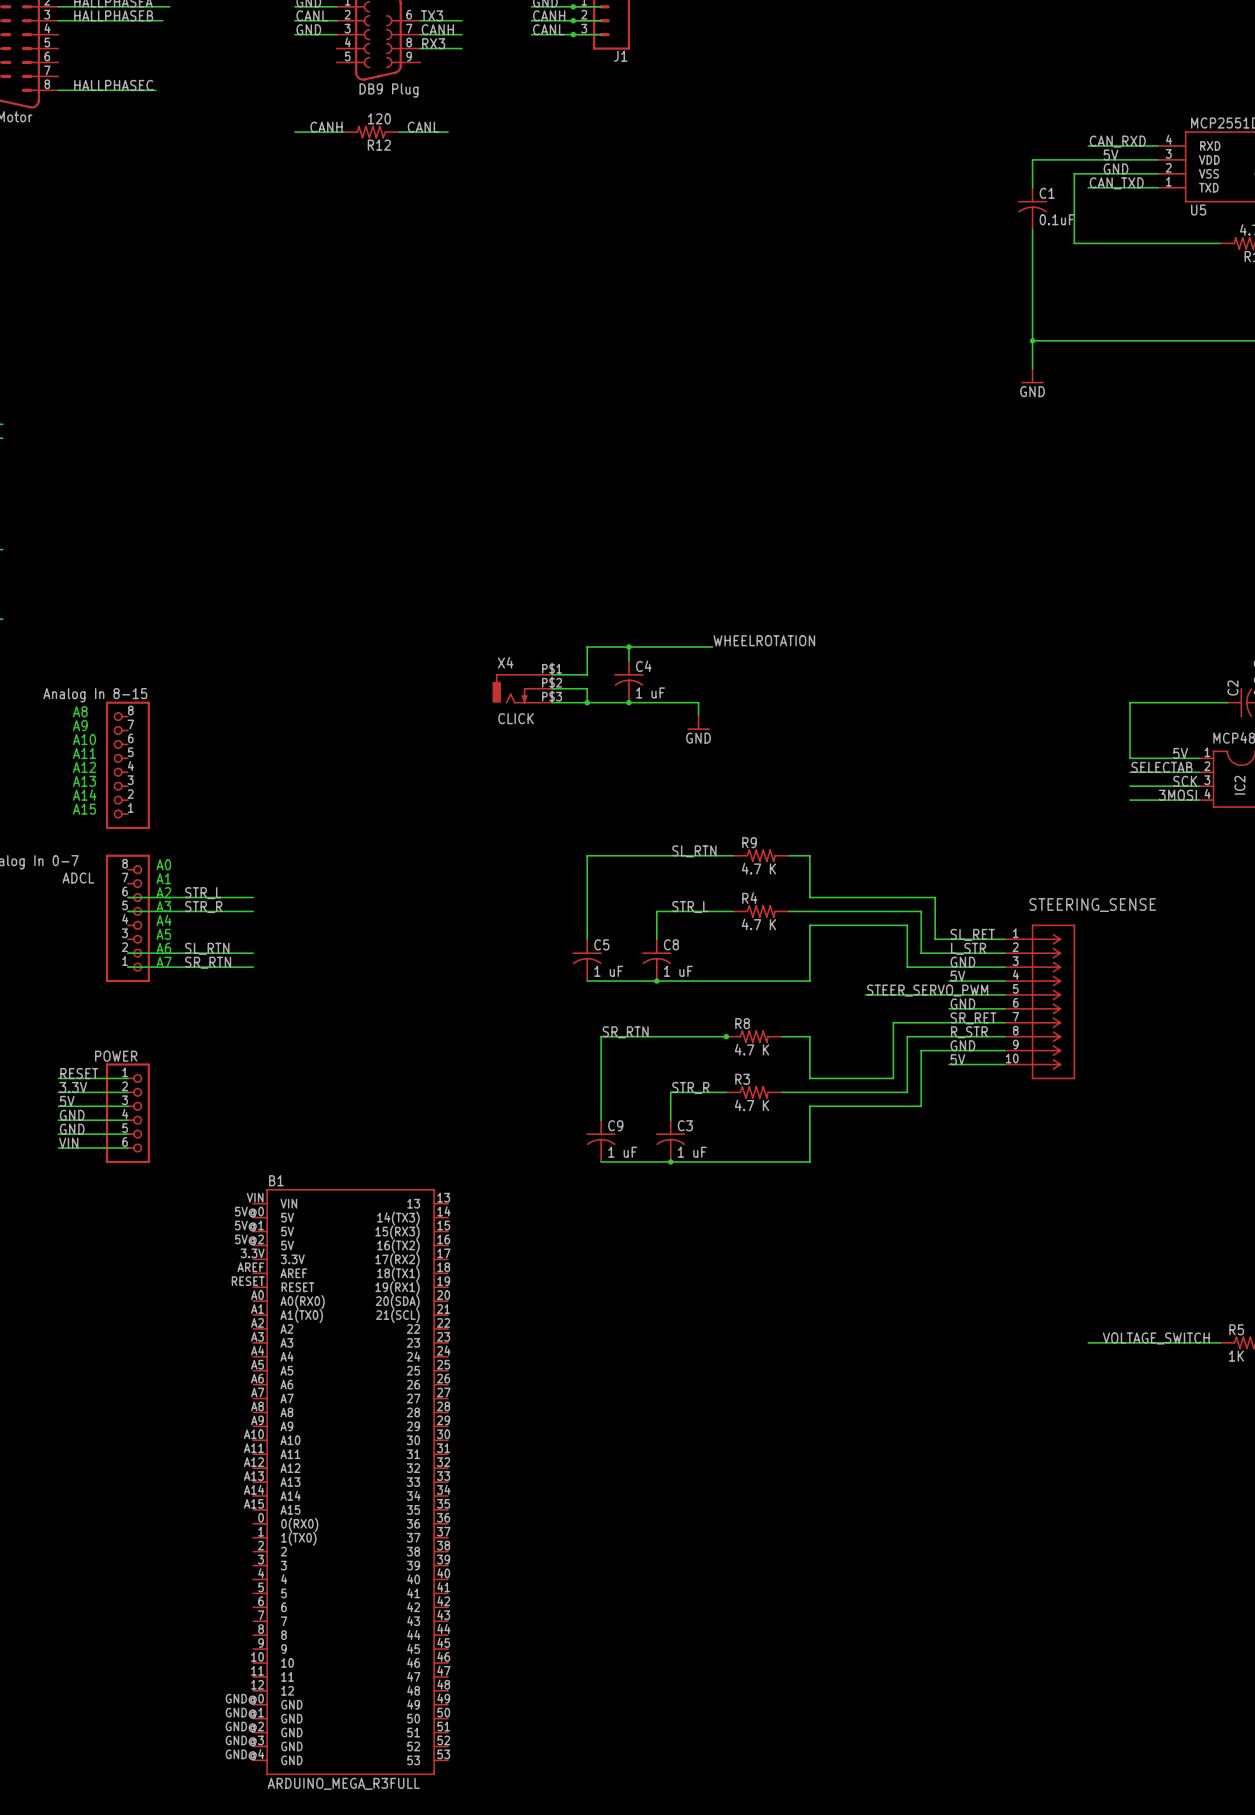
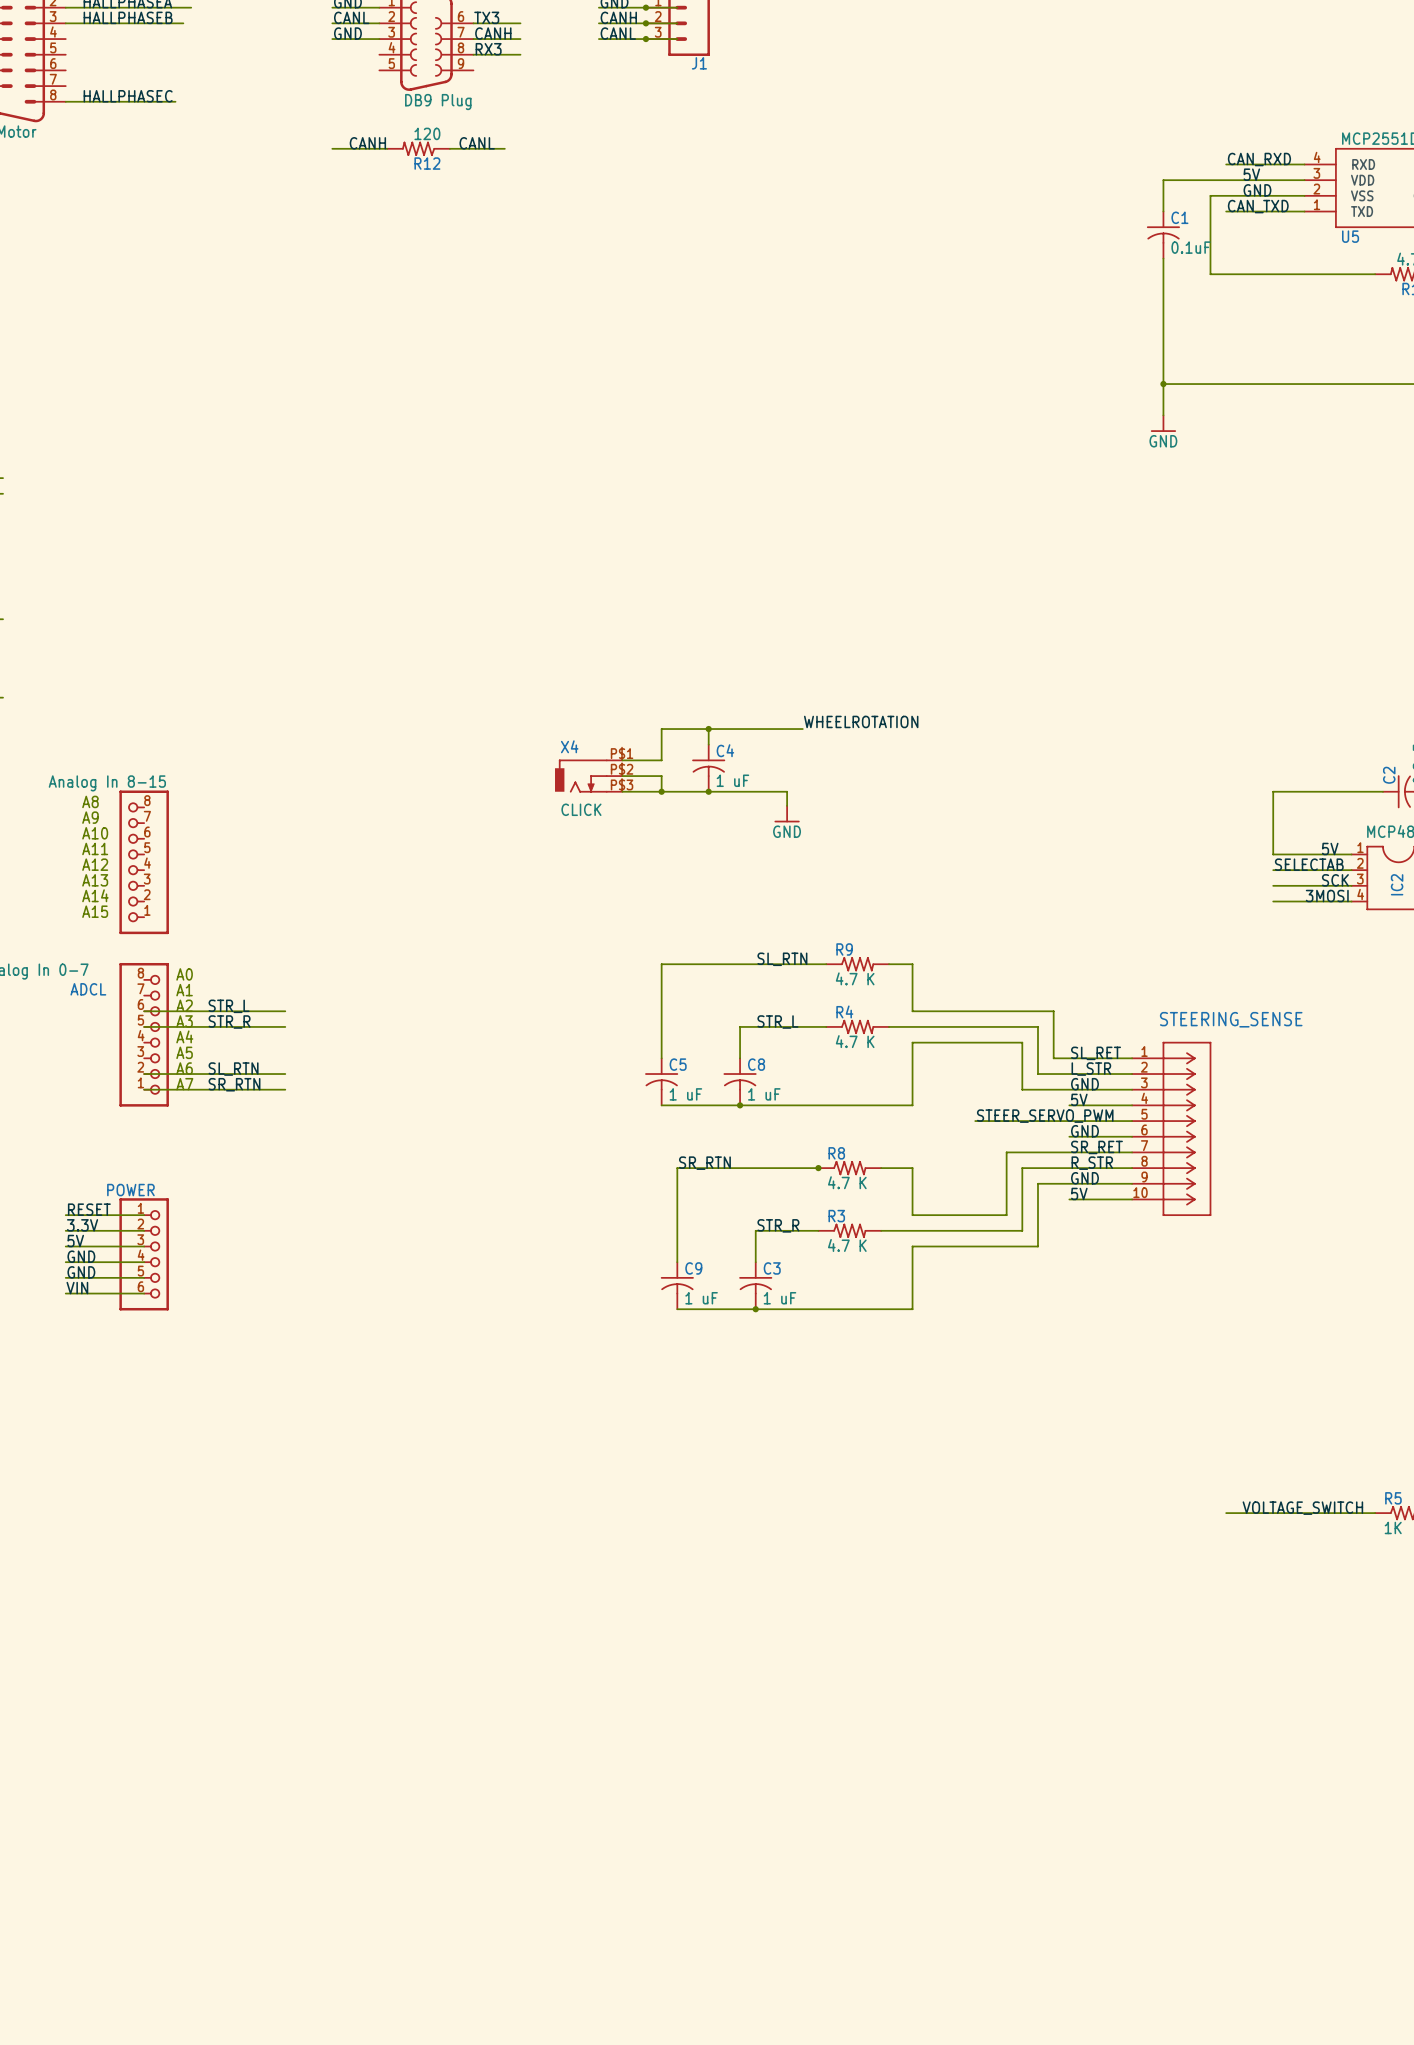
B1: ARDUINO_MEGA_R3FULL (350, 1482) -> none

